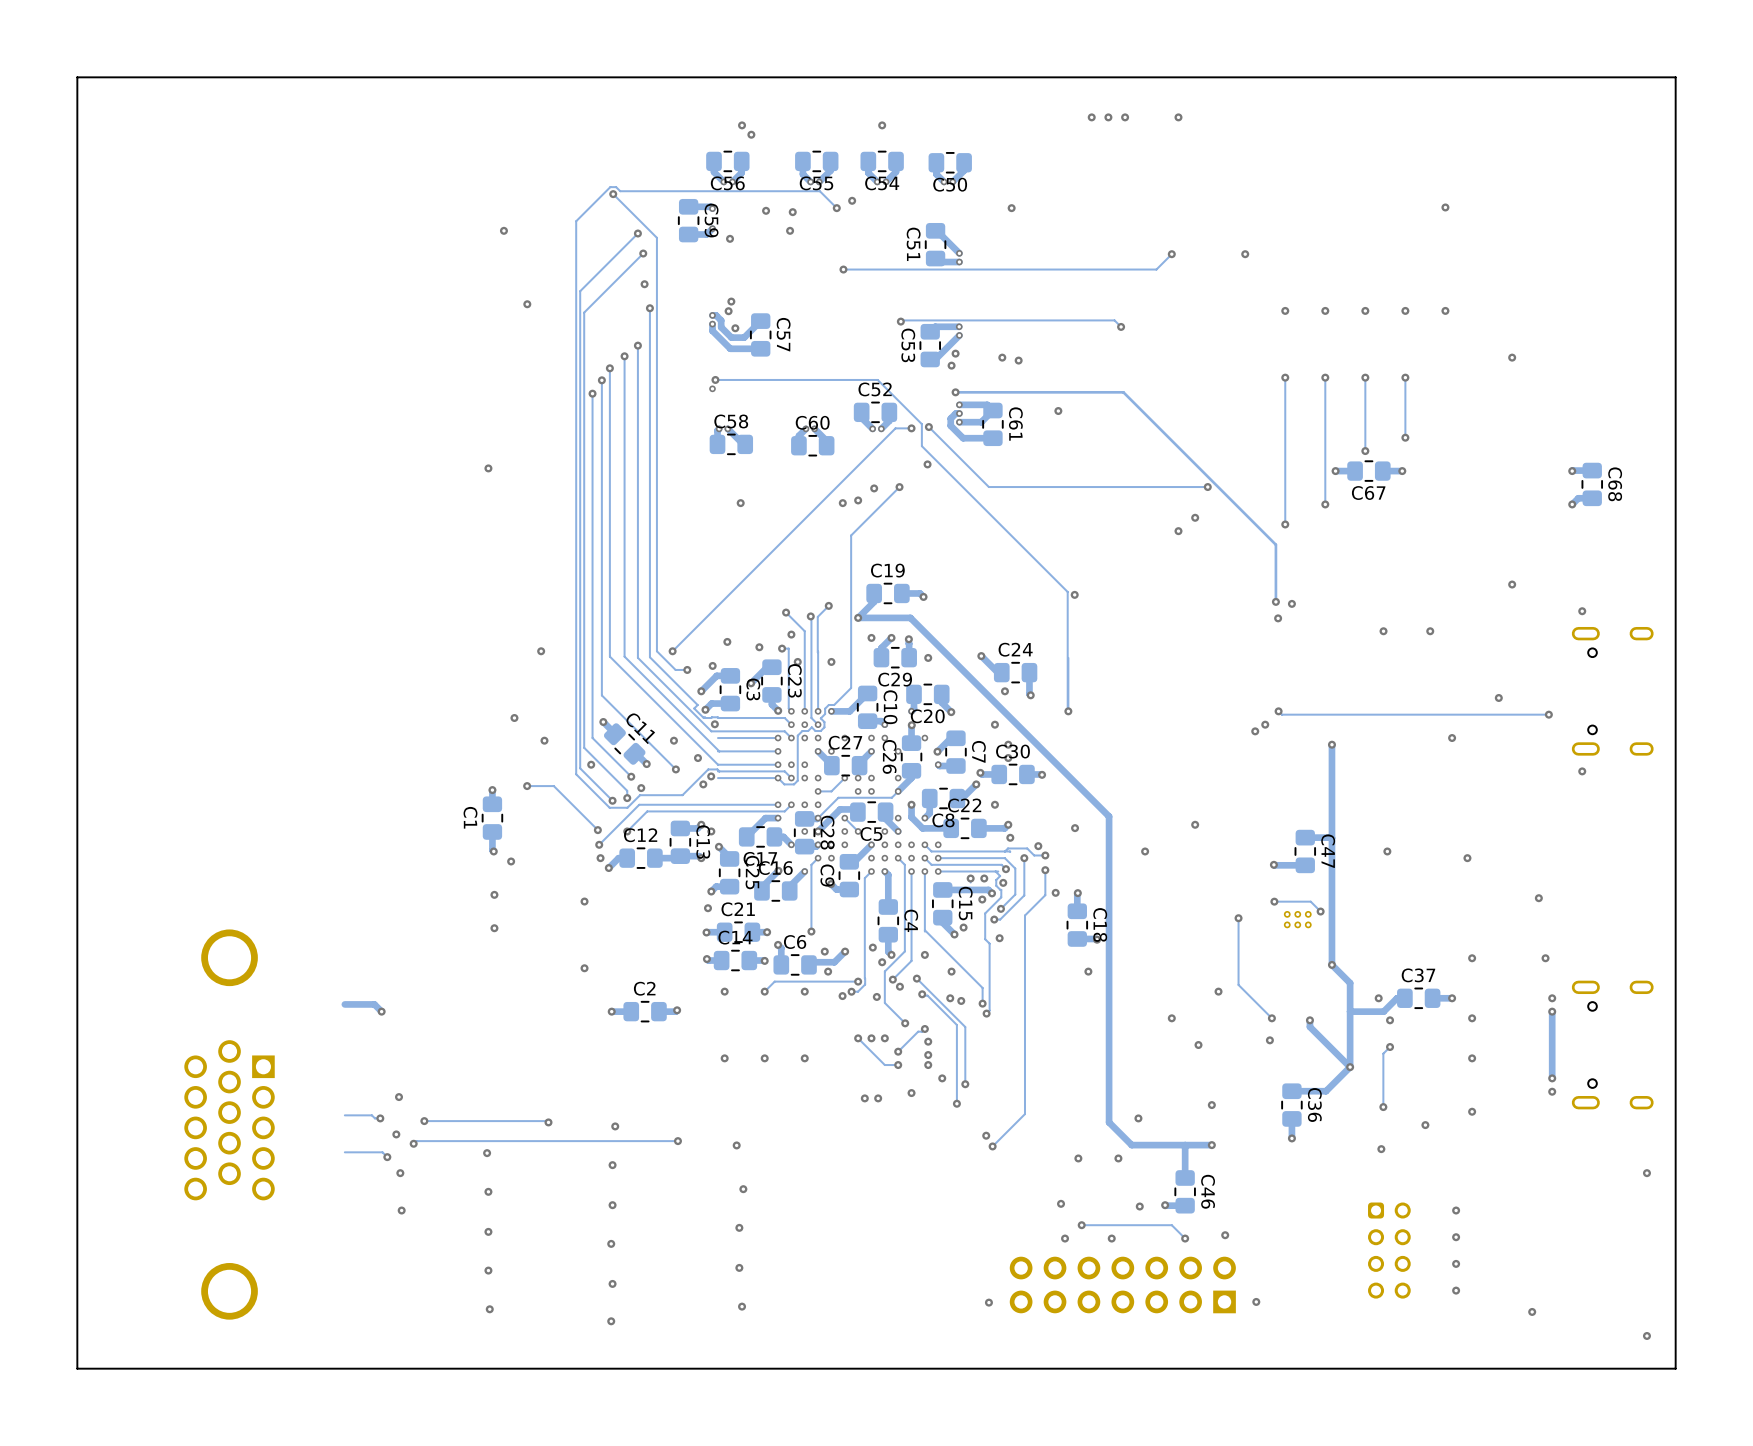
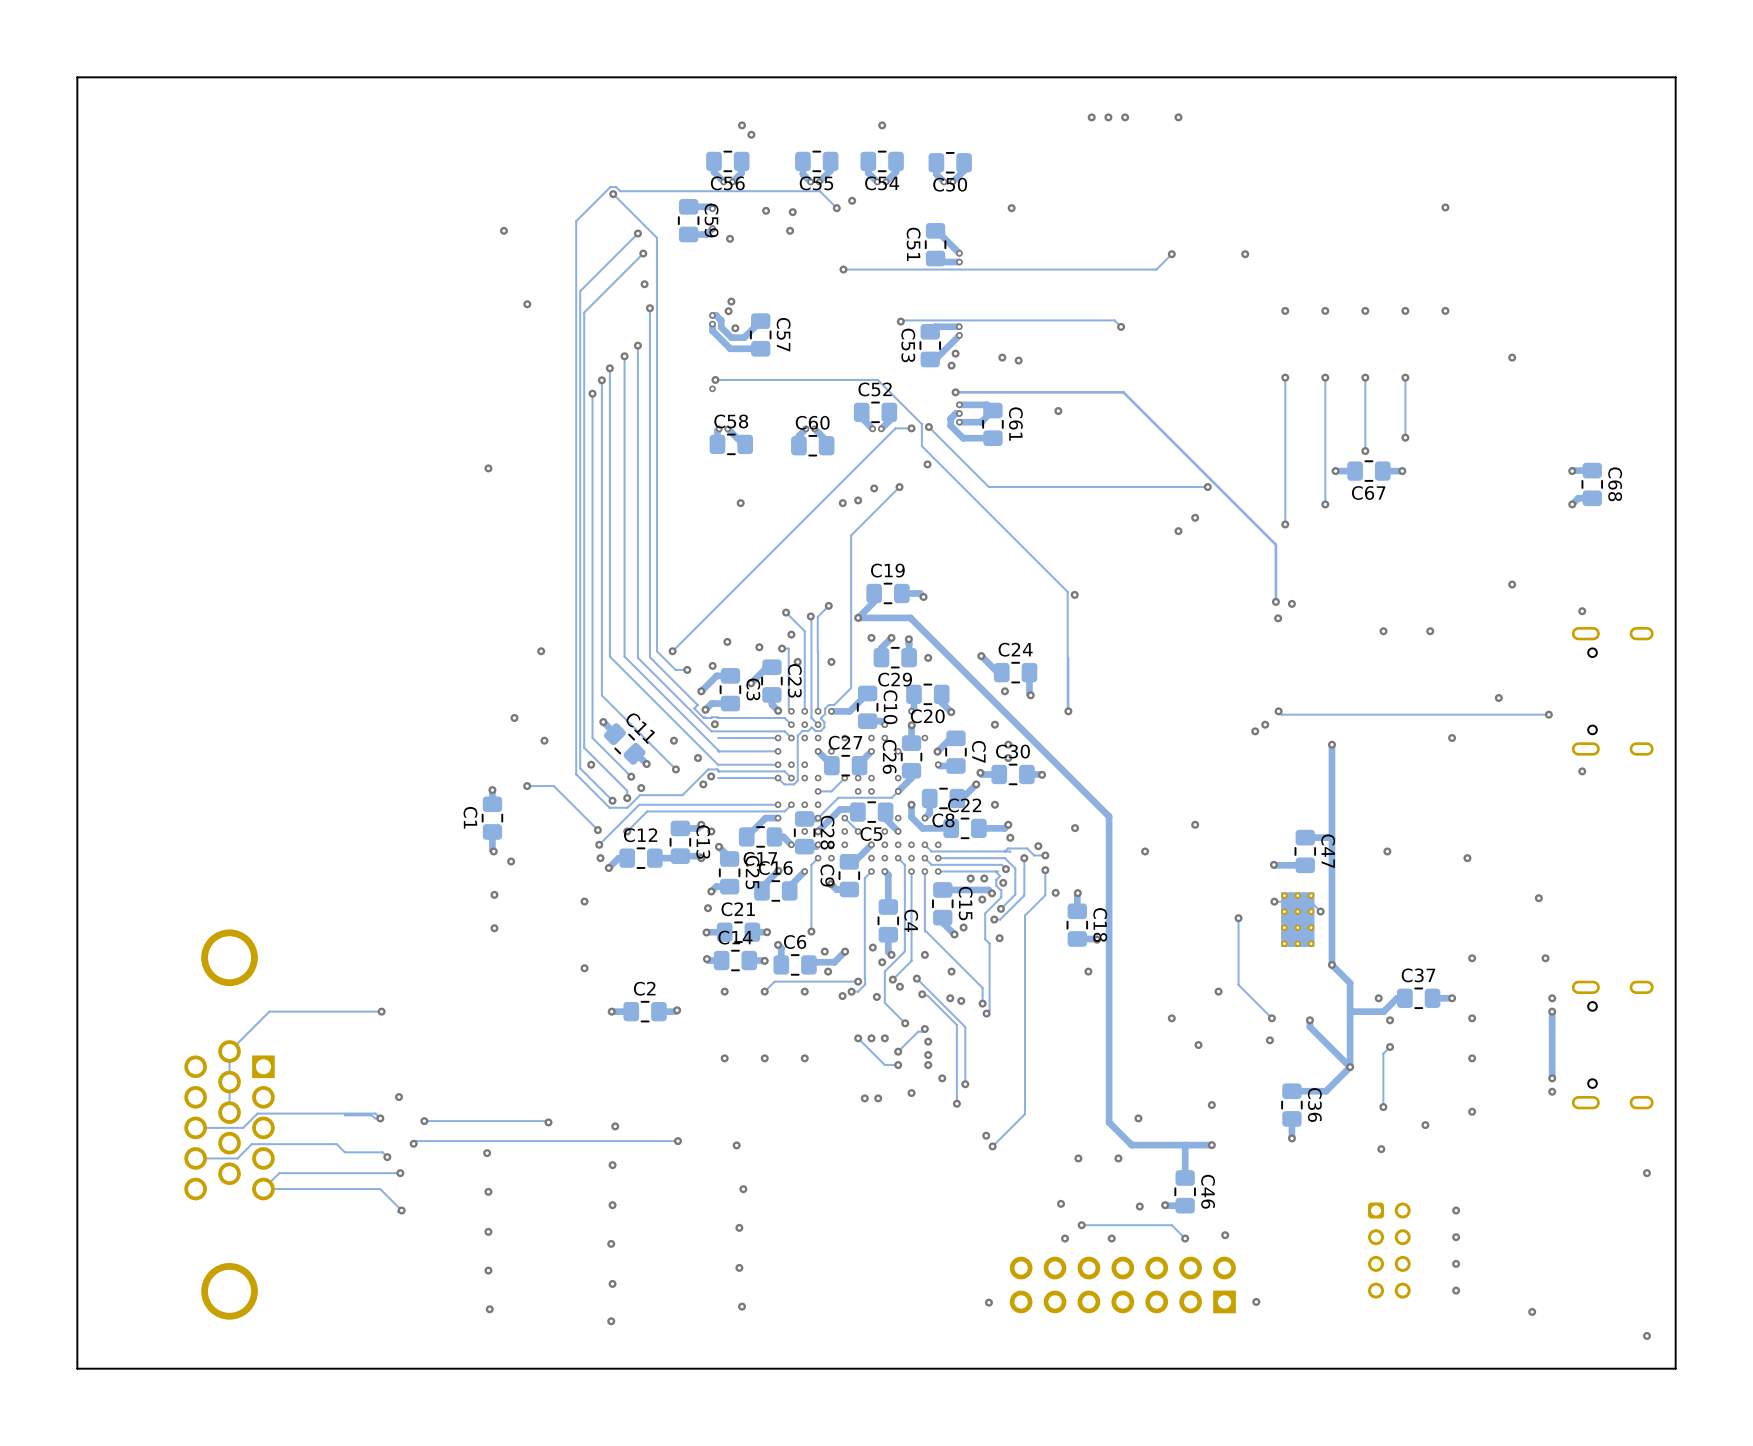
part footprint: [1283, 910, 1312, 929] -> [1281, 892, 1315, 947]
track: (344, 1004) (374, 1004) (381, 1011) -> (229, 1112) (229, 1051) (269, 1011) (381, 1011)
track: none -> (380, 1118) (375, 1113) (257, 1113) (243, 1127) (195, 1127)
via: (396, 1134) -> none
track: none -> (344, 1152) (336, 1144) (251, 1144) (237, 1158) (195, 1158)
track: none -> (400, 1173) (279, 1173) (263, 1189) (380, 1189) (401, 1210) (397, 1211)

